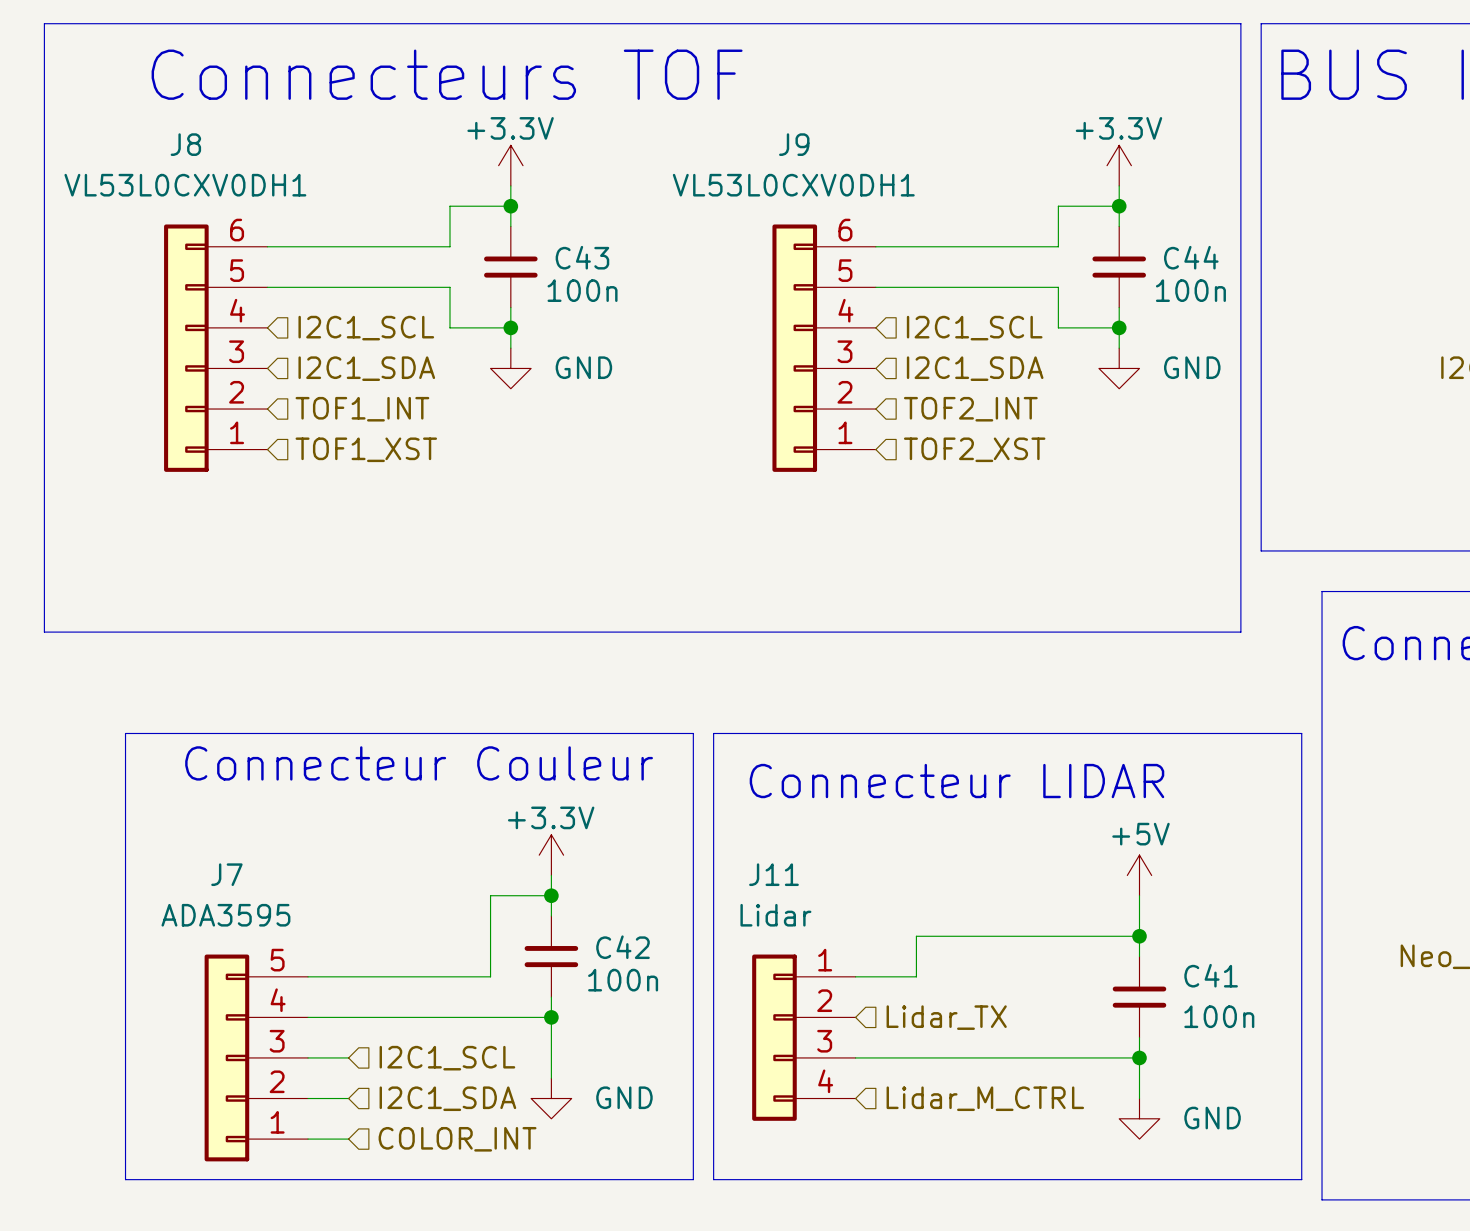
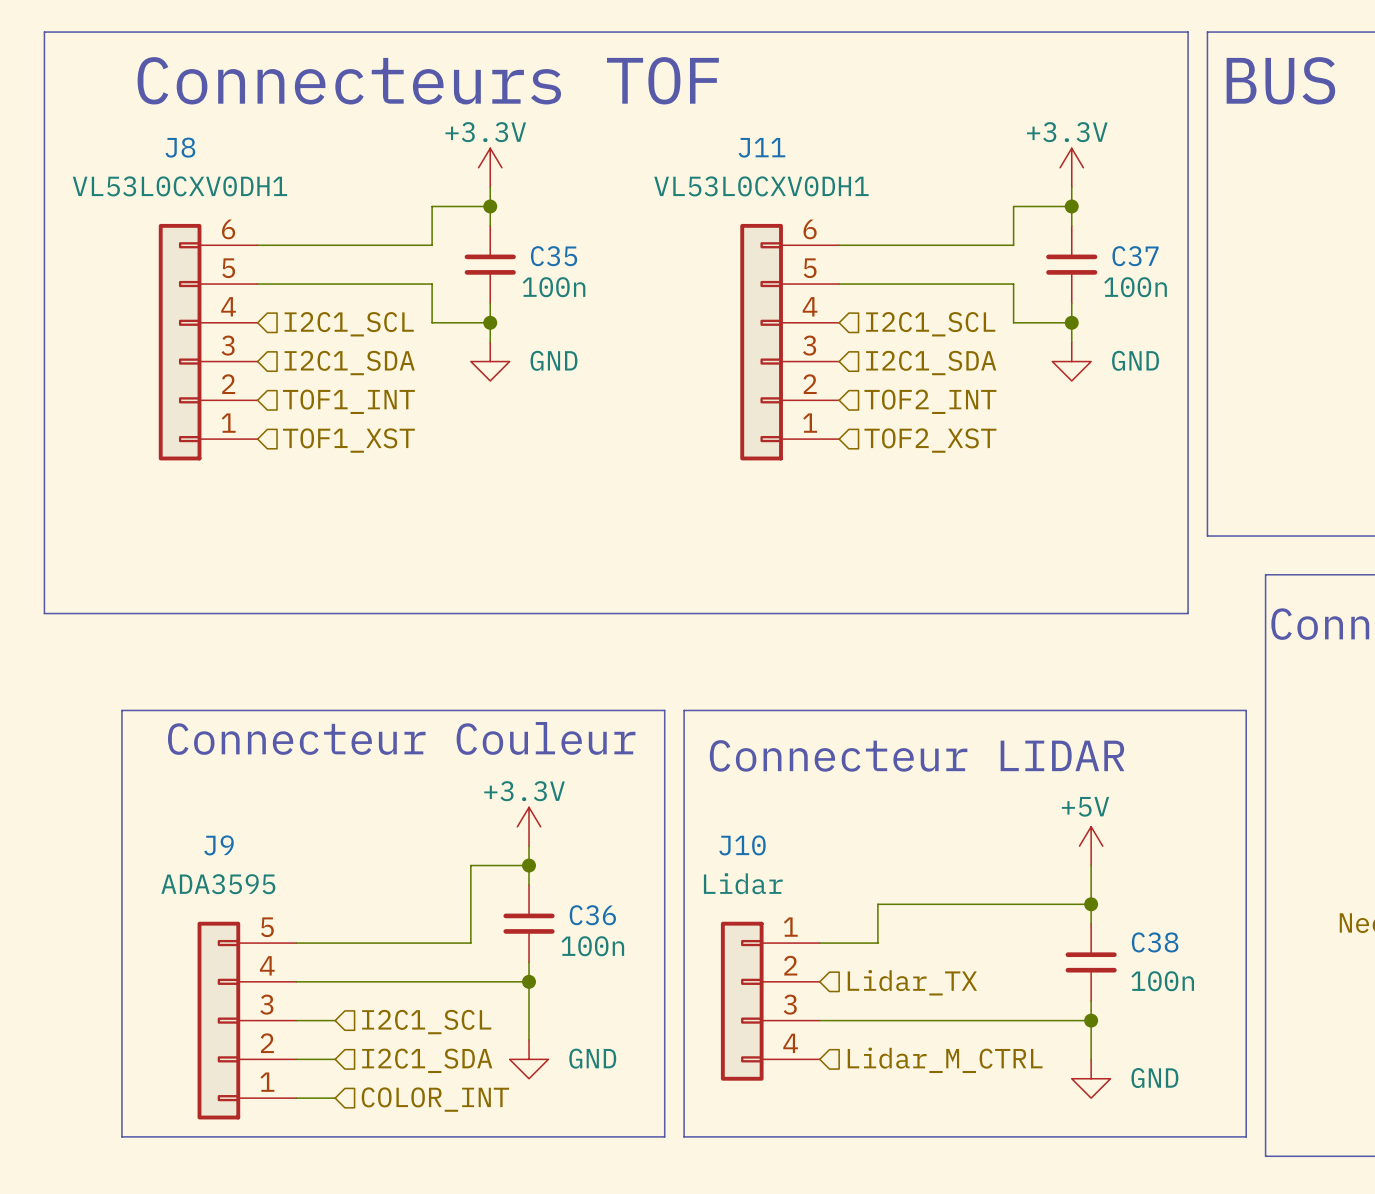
J9 name: J9 (794, 144) -> J11 (761, 147)
C43 name: C43 (582, 257) -> C35 (554, 256)
C44 name: C44 (1191, 257) -> C37 (1135, 256)
J7 name: J7 (226, 874) -> J9 (219, 845)
J11 name: J11 (773, 874) -> J10 (742, 845)
C42 name: C42 (623, 947) -> C36 (592, 915)
C41 name: C41 (1211, 975) -> C38 (1155, 942)

